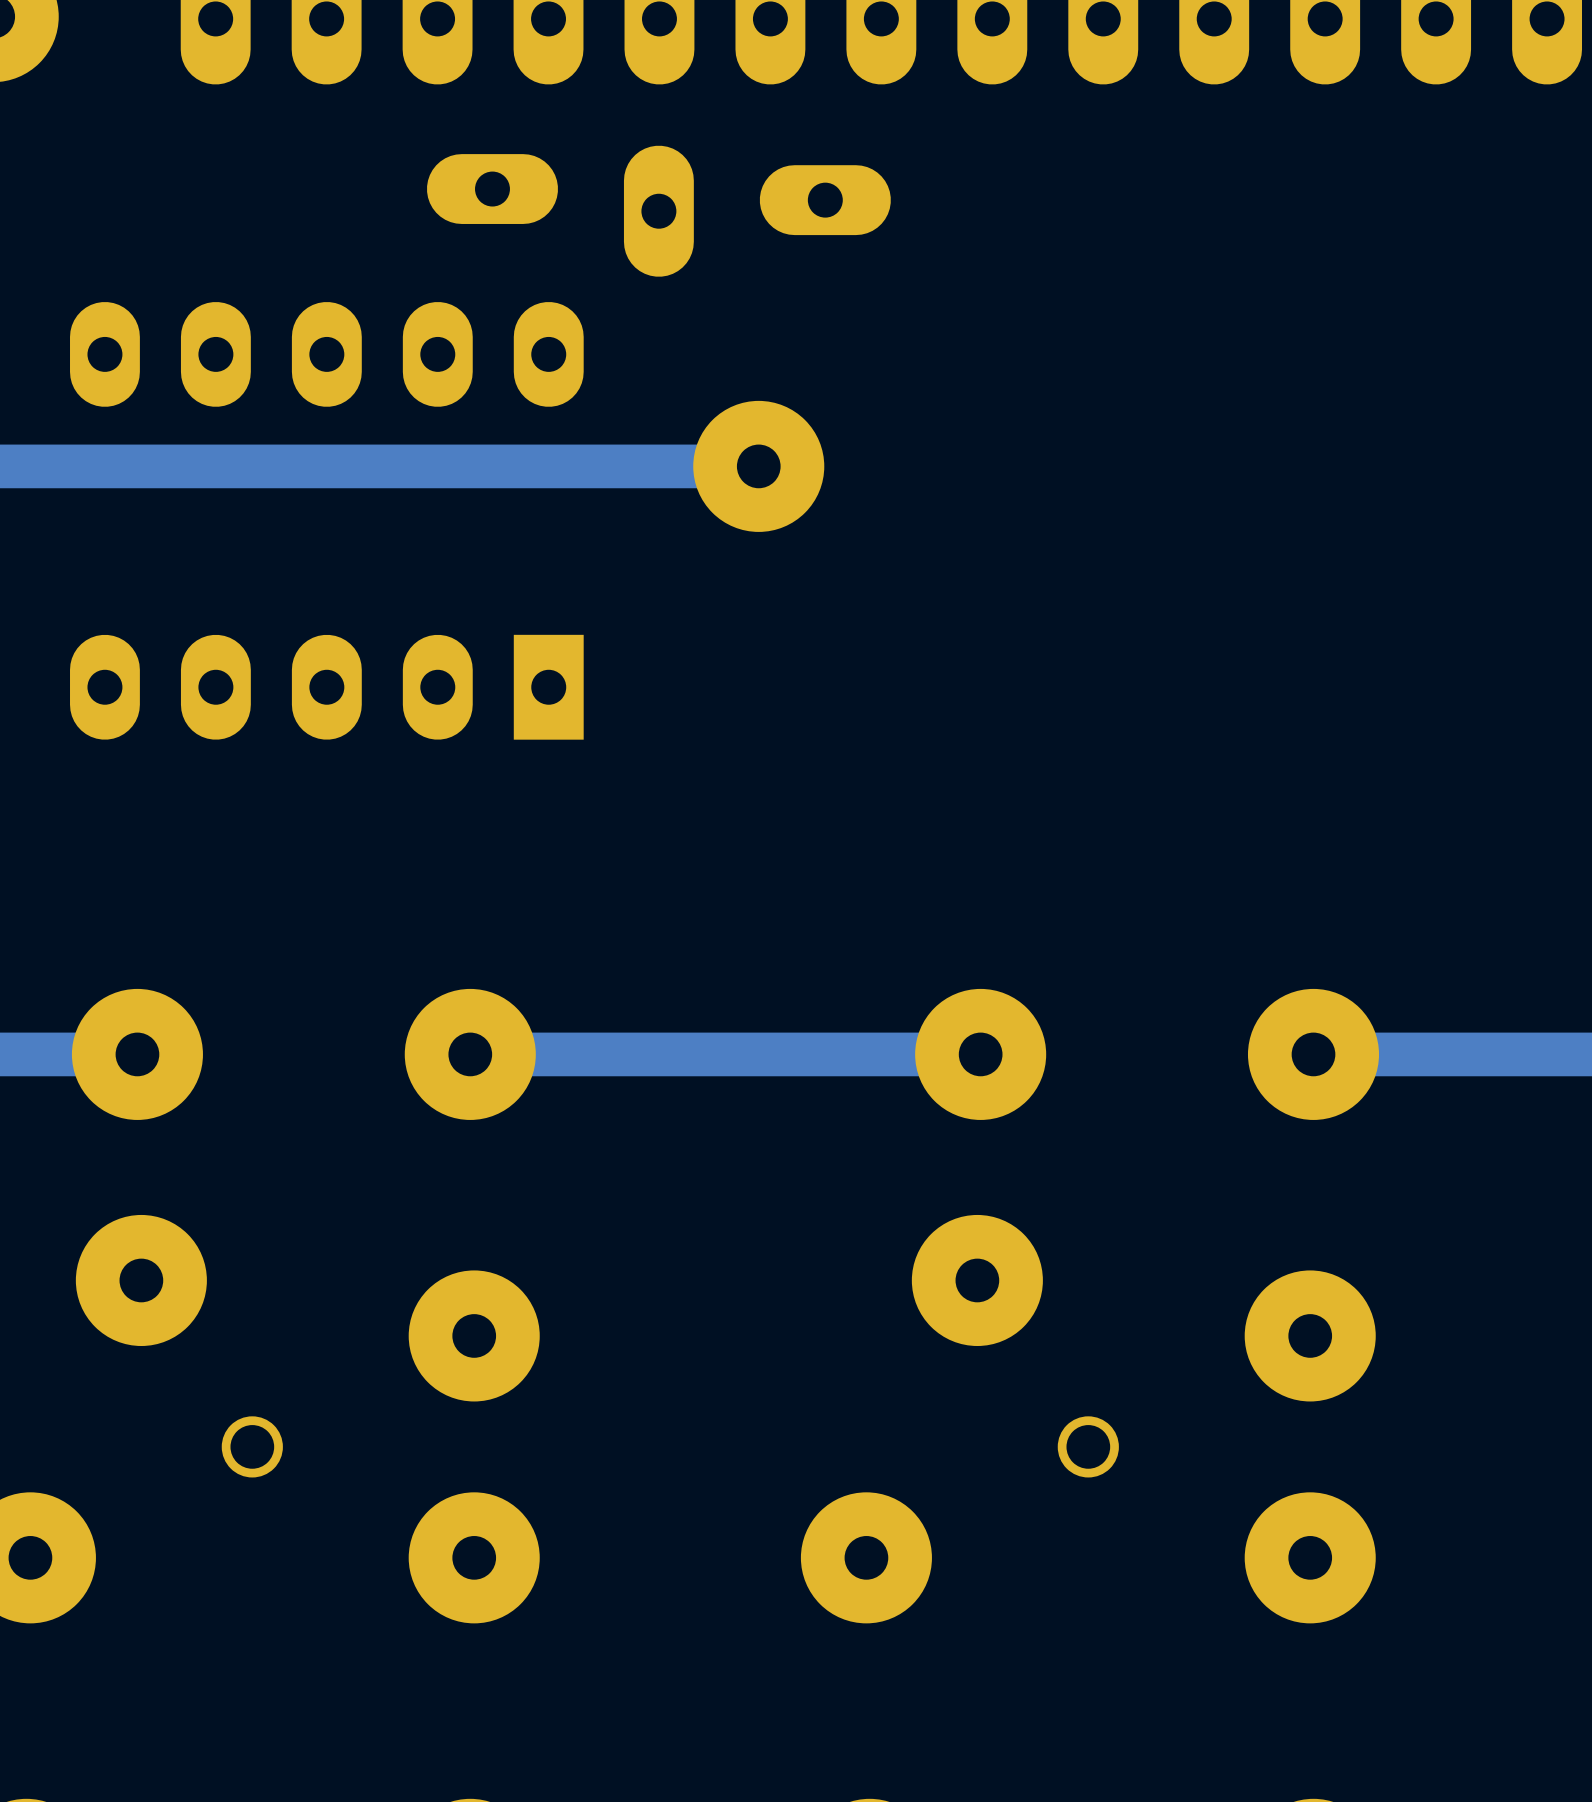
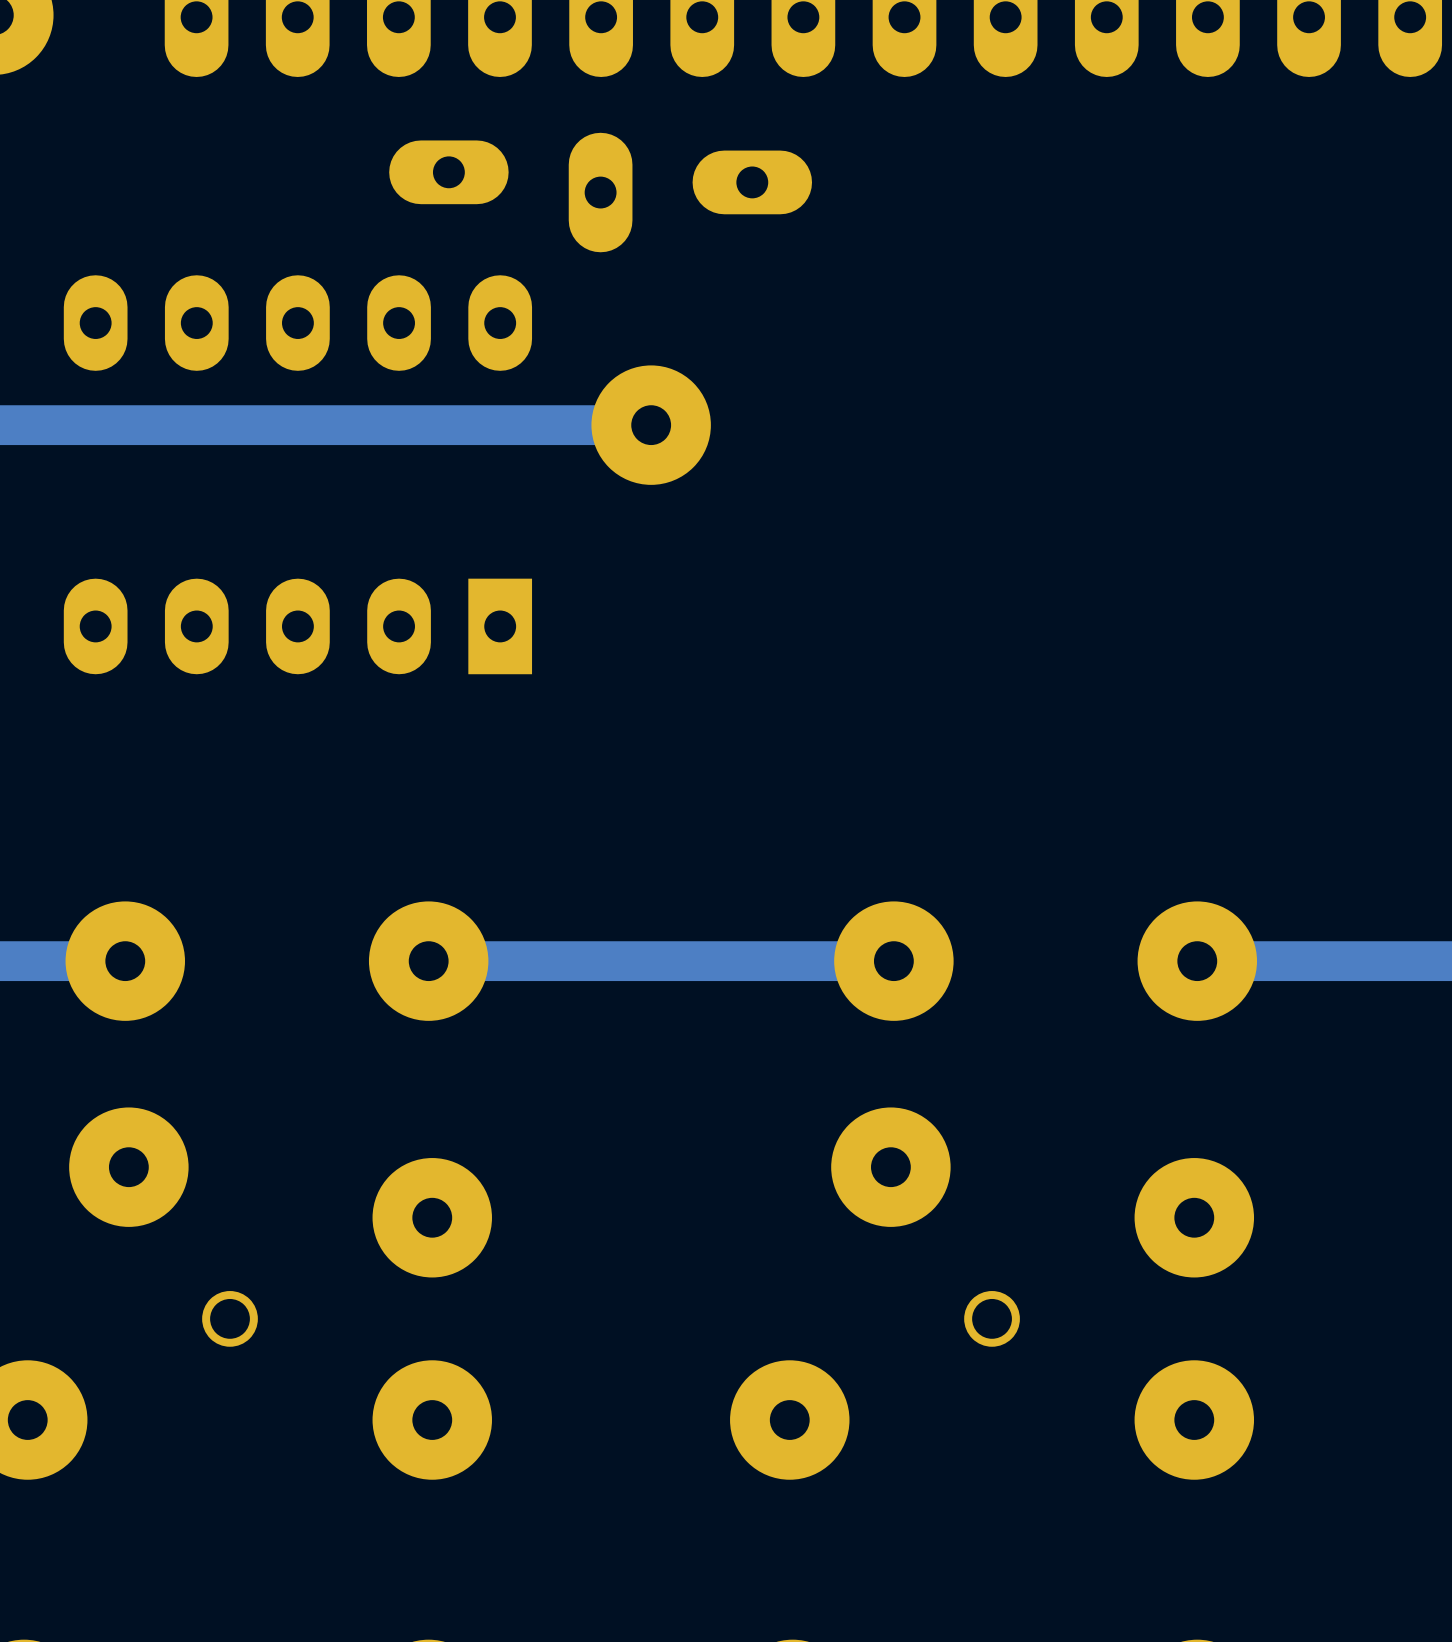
part position: (758, 466) -> (651, 425)

